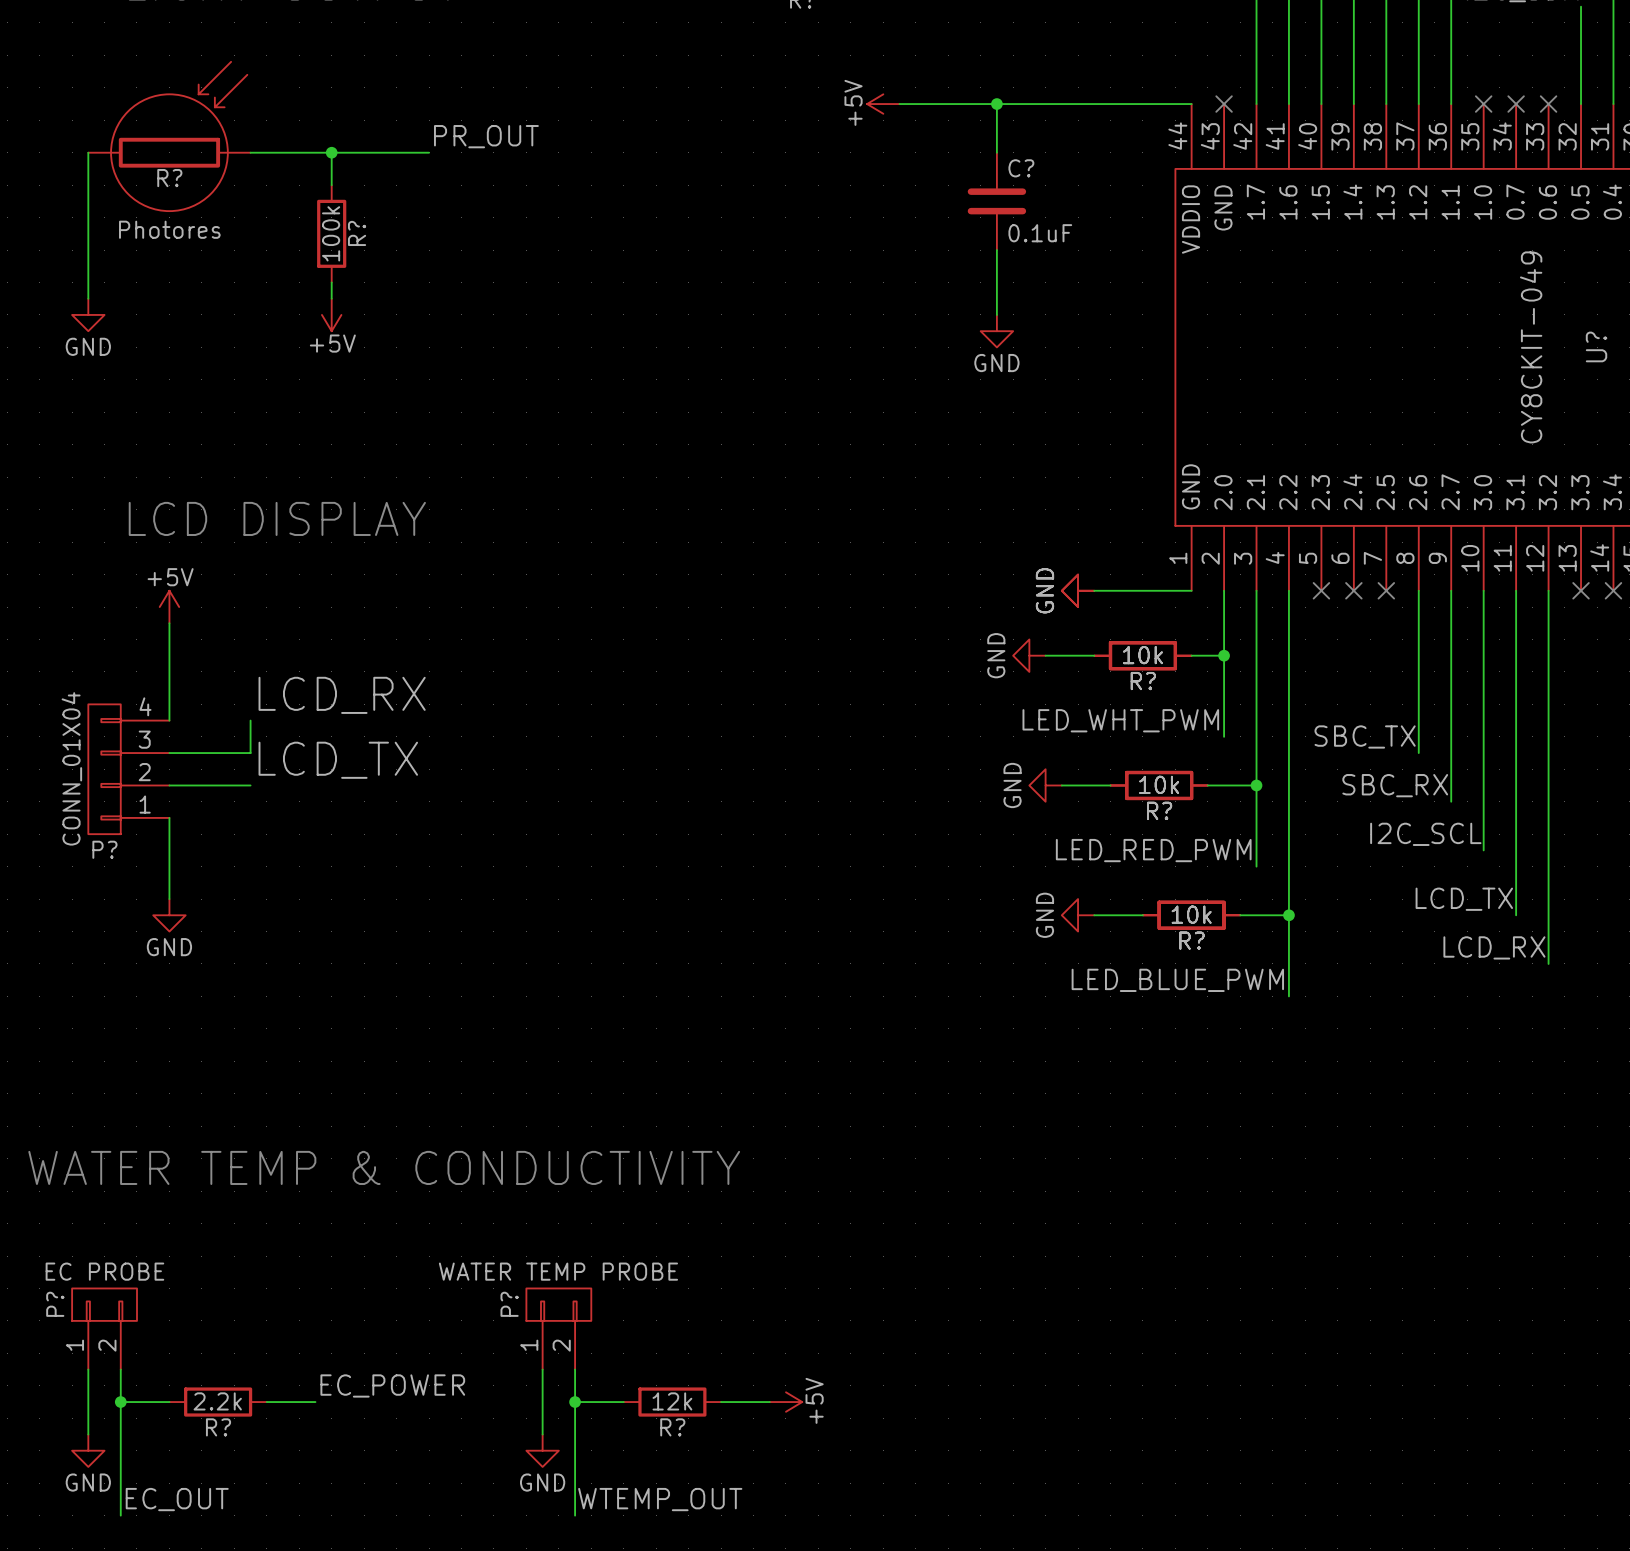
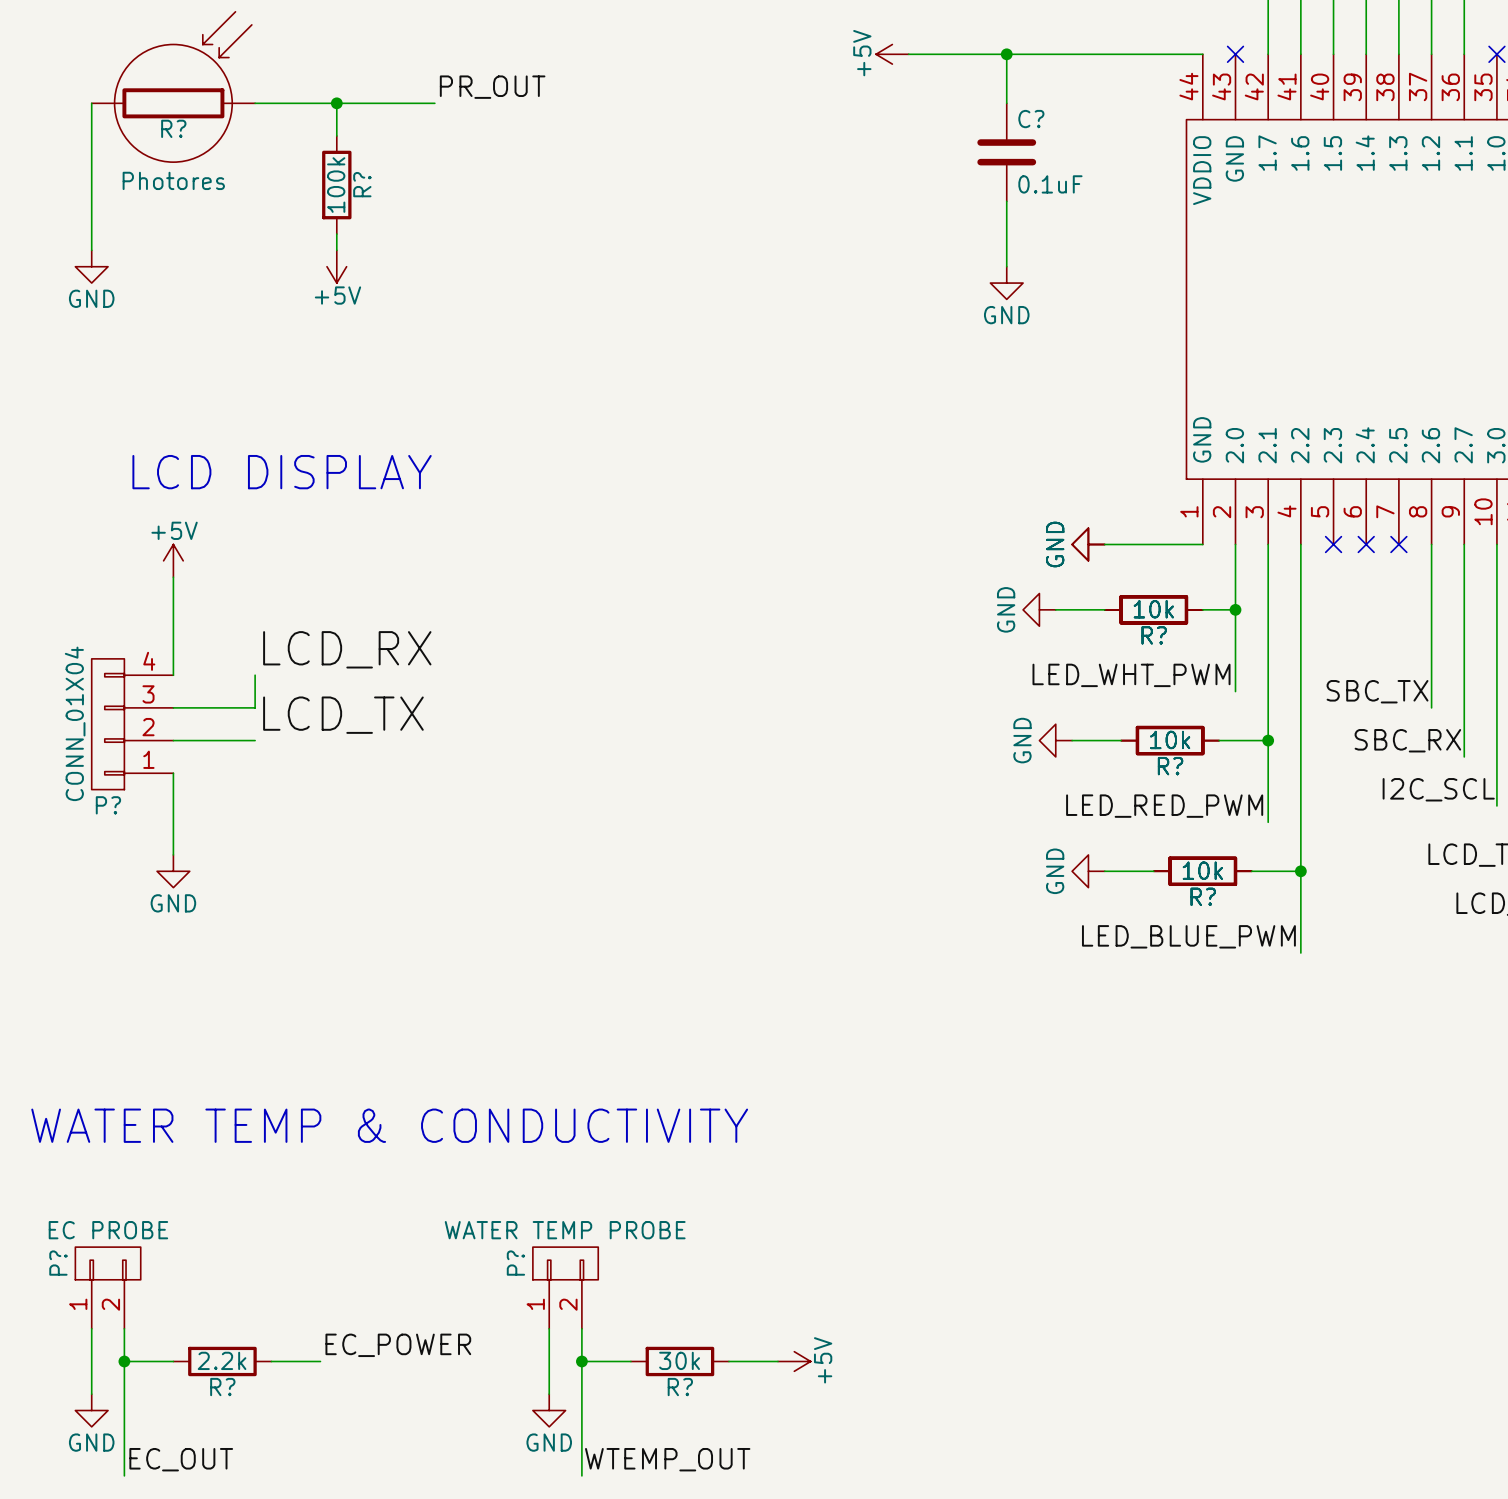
R? value: 12k (672, 1401) -> 30k (679, 1360)

